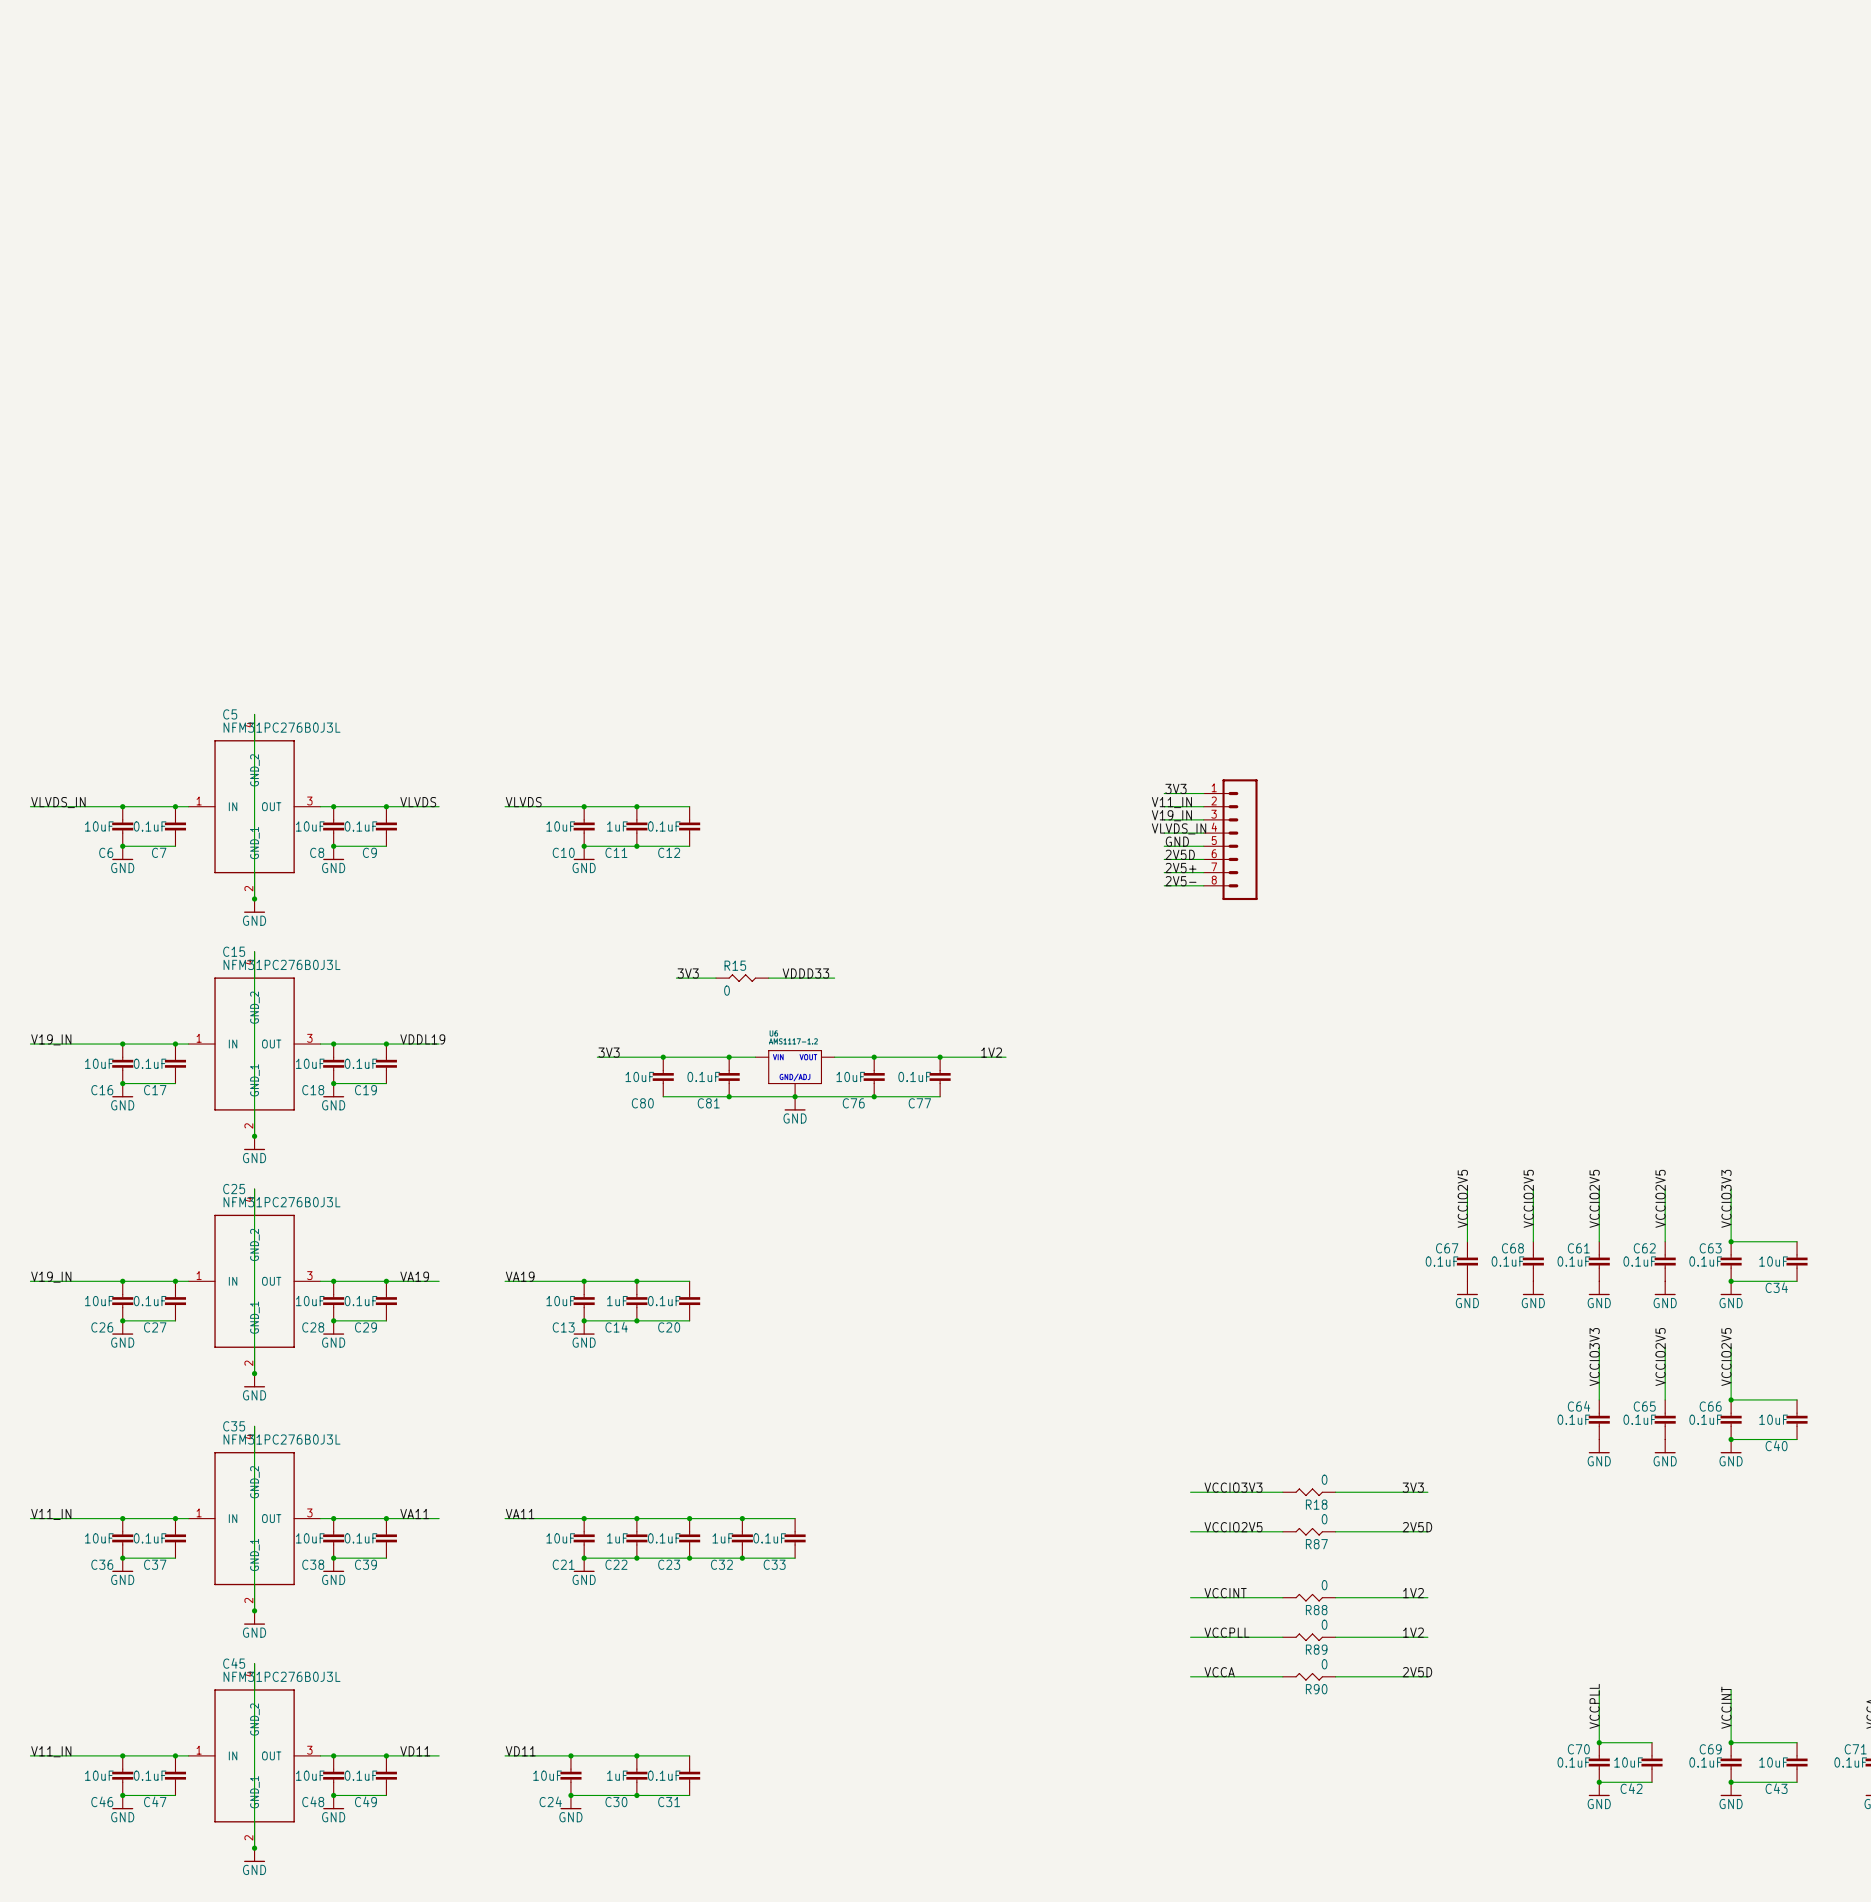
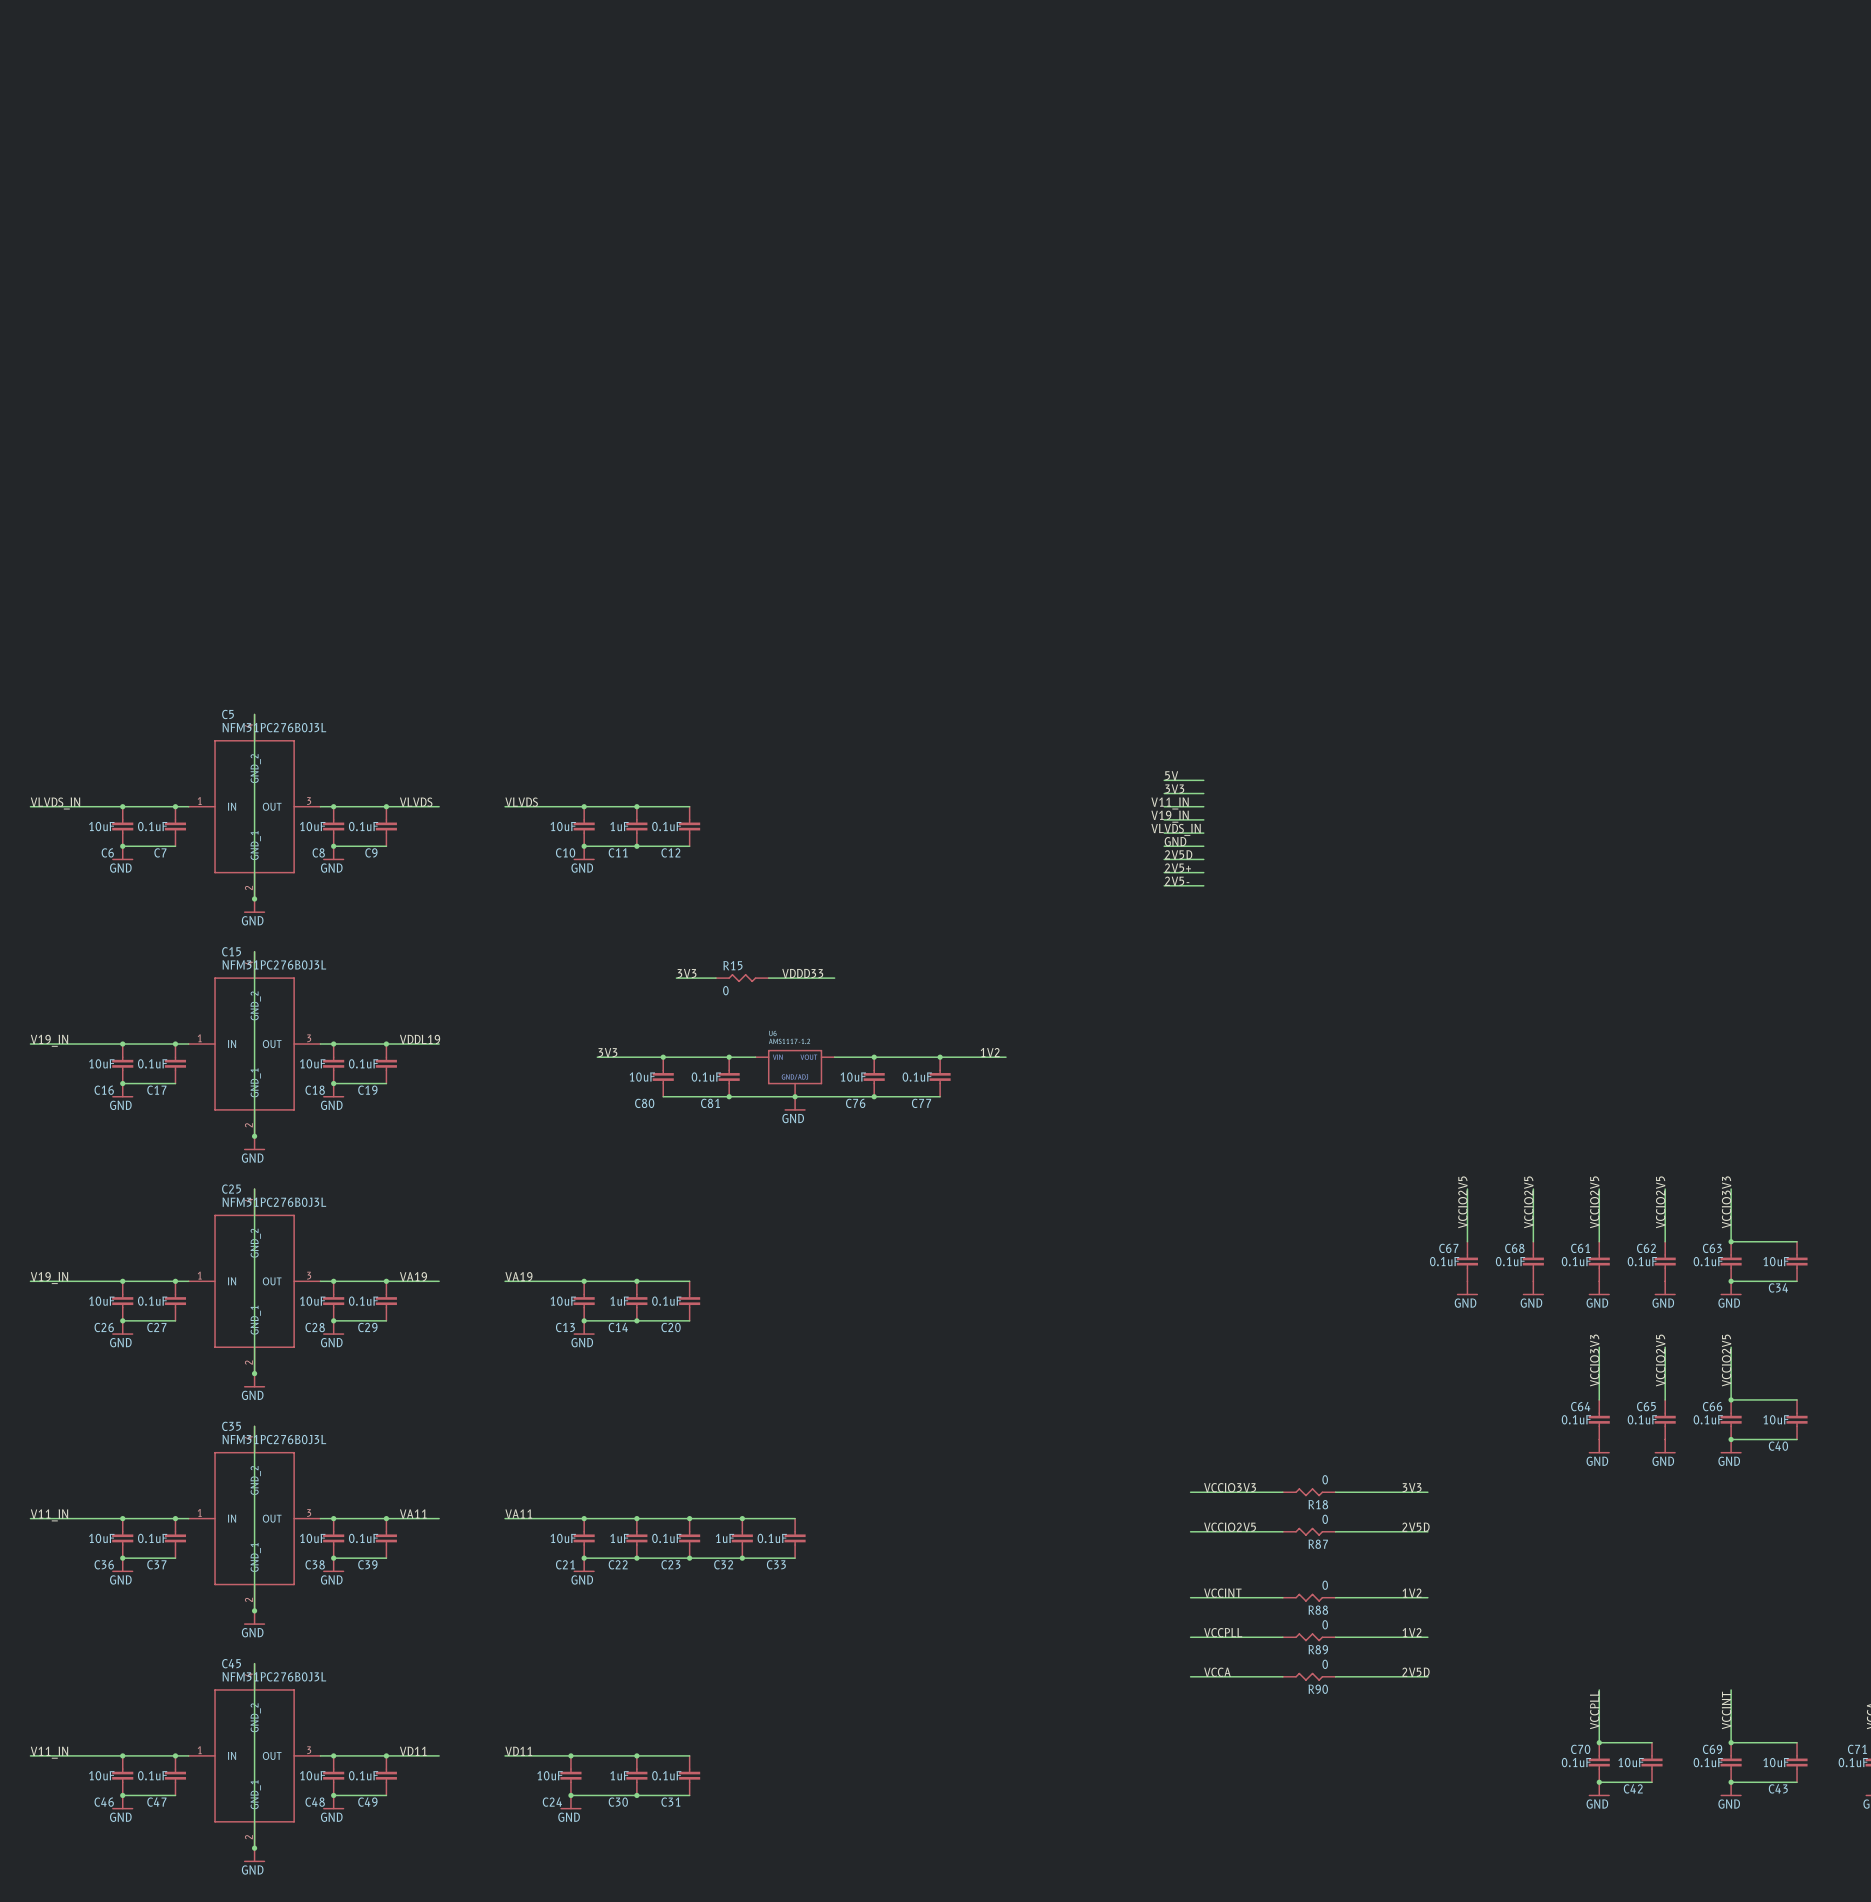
label: none -> 5V (1171, 775)
wire: none -> (1164, 780) (1203, 780)
part: (1230, 839) -> none

